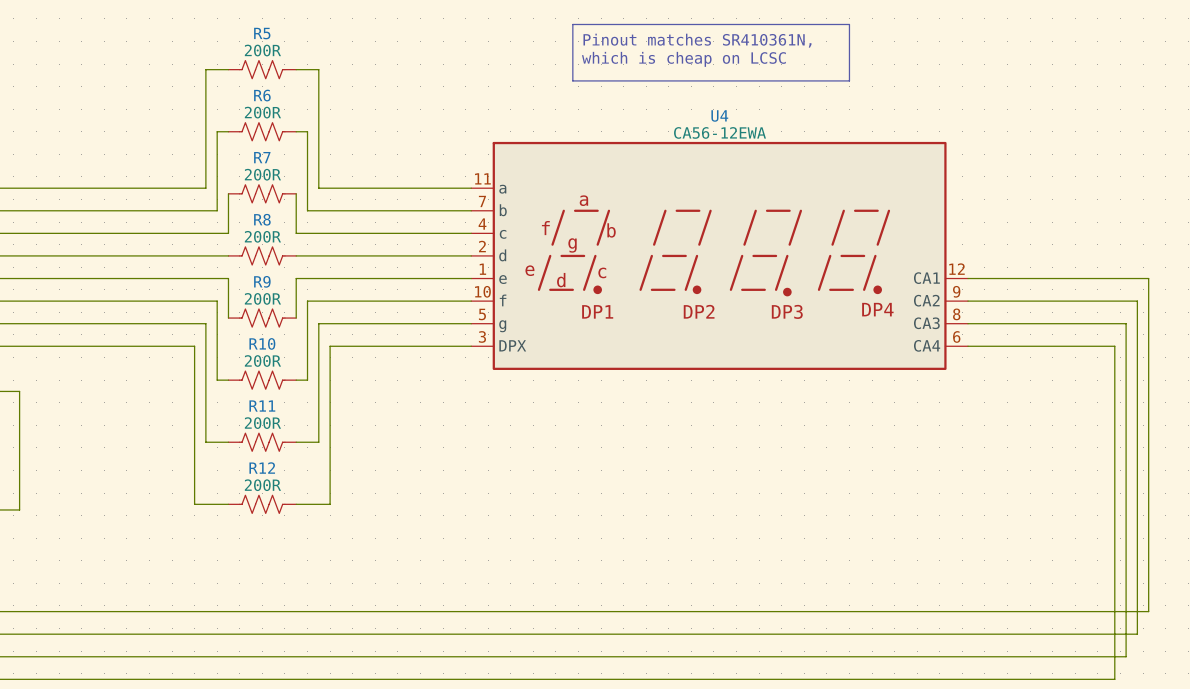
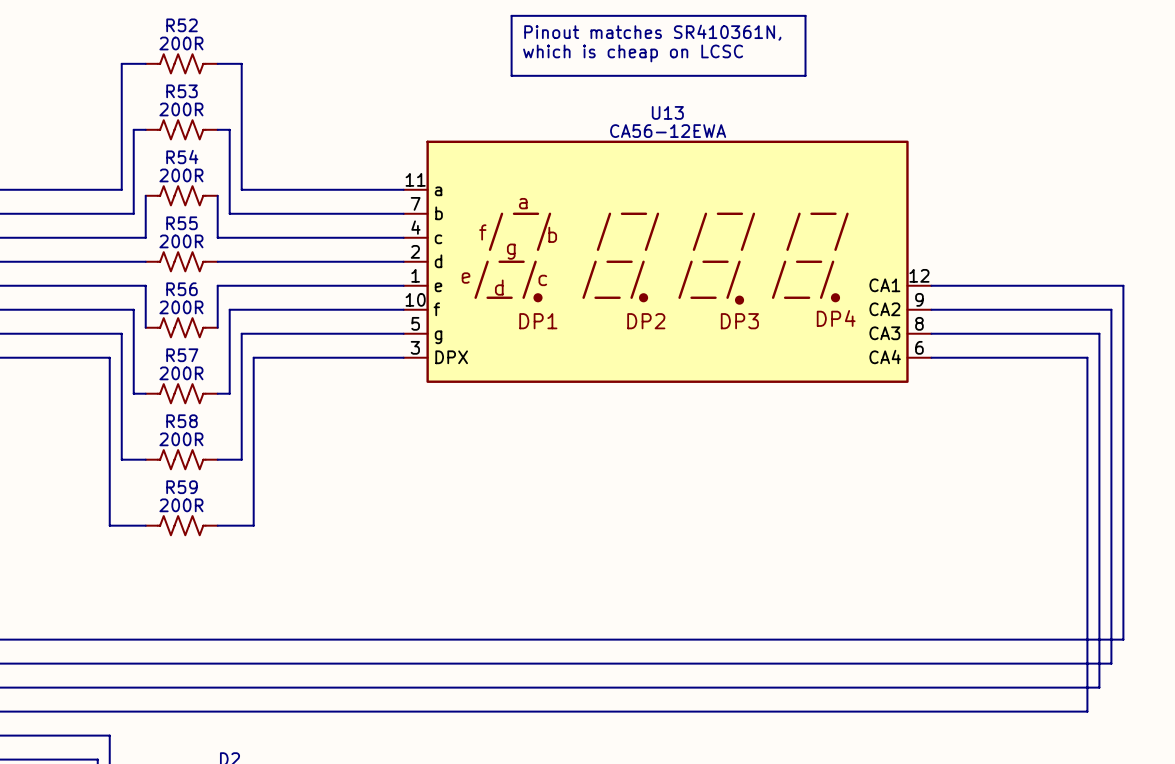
R5 name: R5 (262, 33) -> R52 (182, 25)
R6 name: R6 (262, 95) -> R53 (182, 91)
U4 name: U4 (719, 115) -> U13 (667, 112)
R7 name: R7 (262, 157) -> R54 (182, 157)
R8 name: R8 (262, 219) -> R55 (182, 223)
R9 name: R9 (262, 281) -> R56 (182, 289)
R10 name: R10 (262, 343) -> R57 (182, 355)
R11 name: R11 (262, 406) -> R58 (182, 421)
R12 name: R12 (262, 468) -> R59 (182, 487)

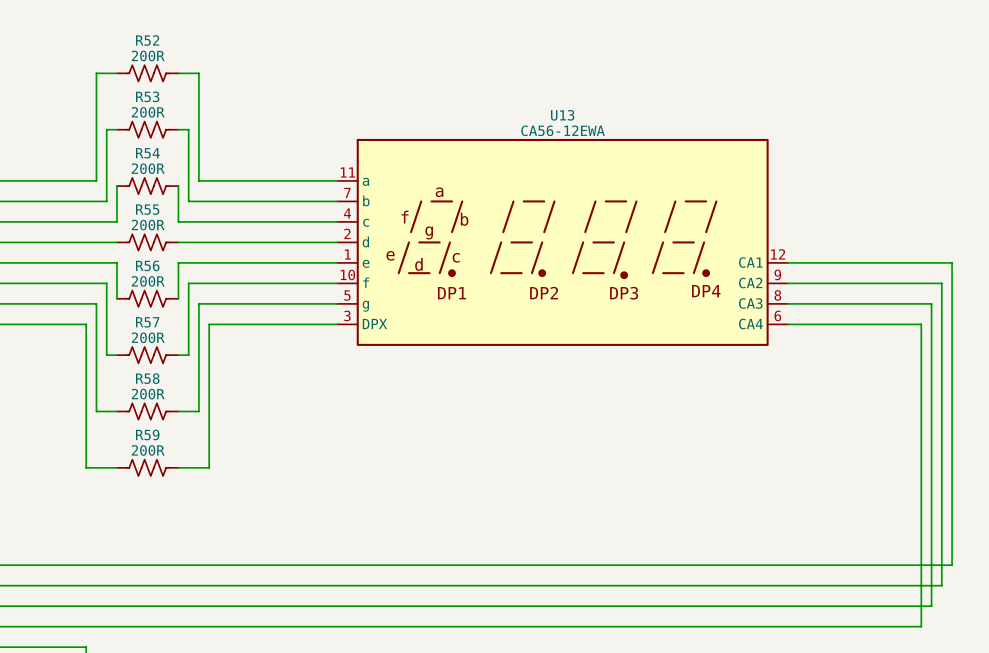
line: (511, 15) (805, 15) (805, 75) (511, 75) (511, 15) -> none
text: Pinout matches SR410361N, (652, 32) -> none
text: which is cheap on LCSC (633, 53) -> none

